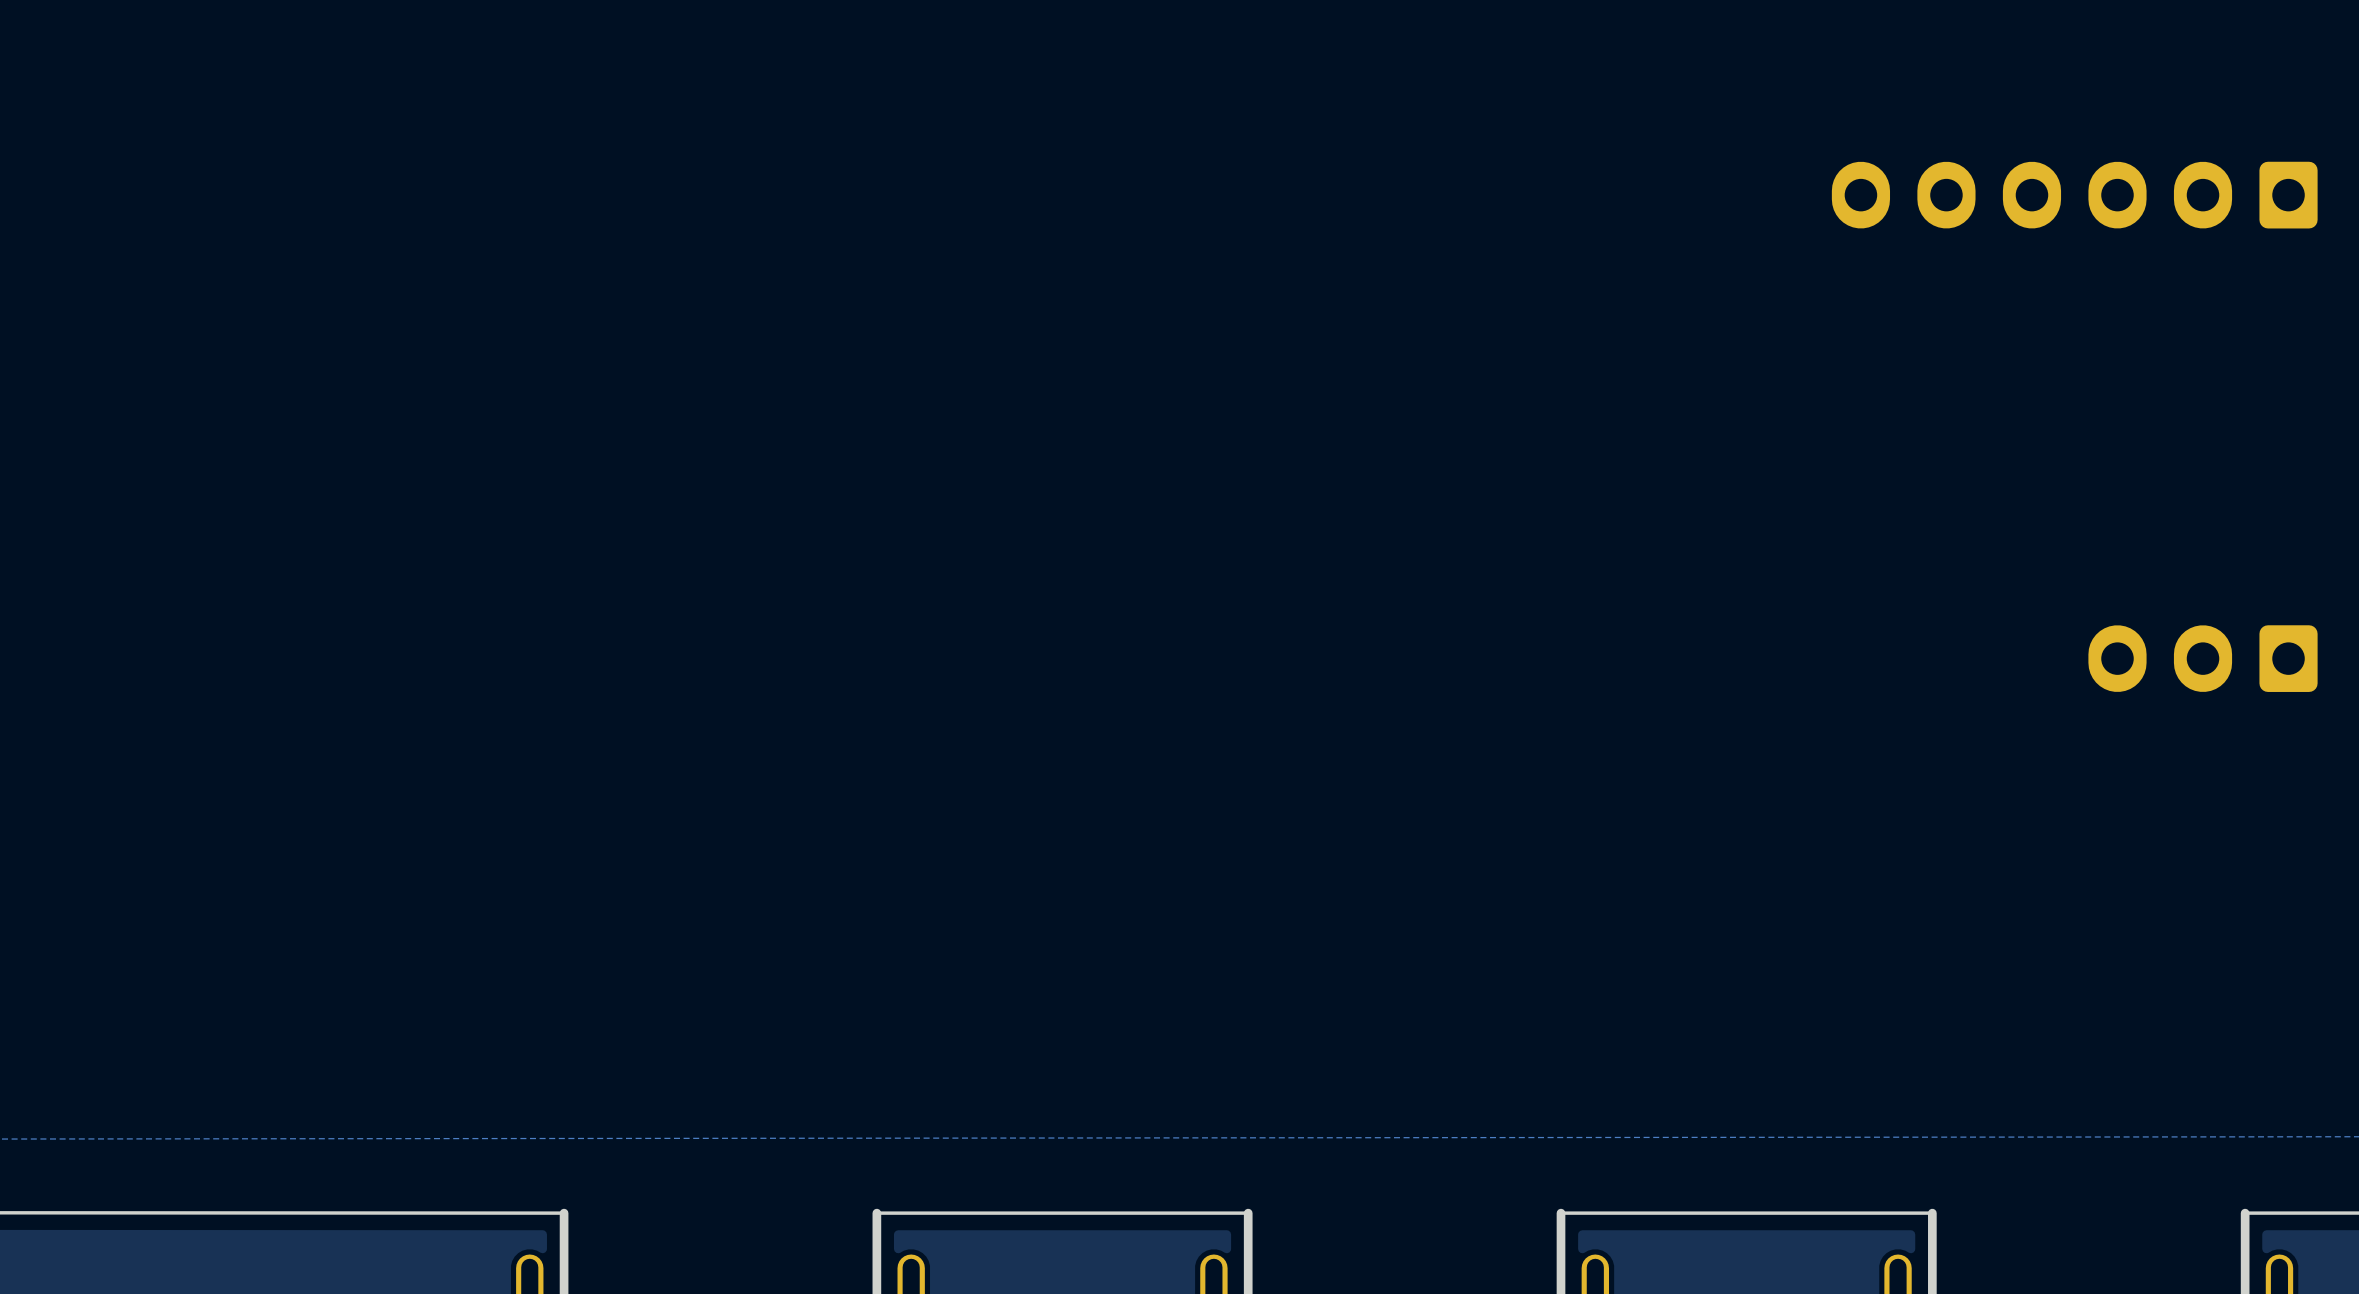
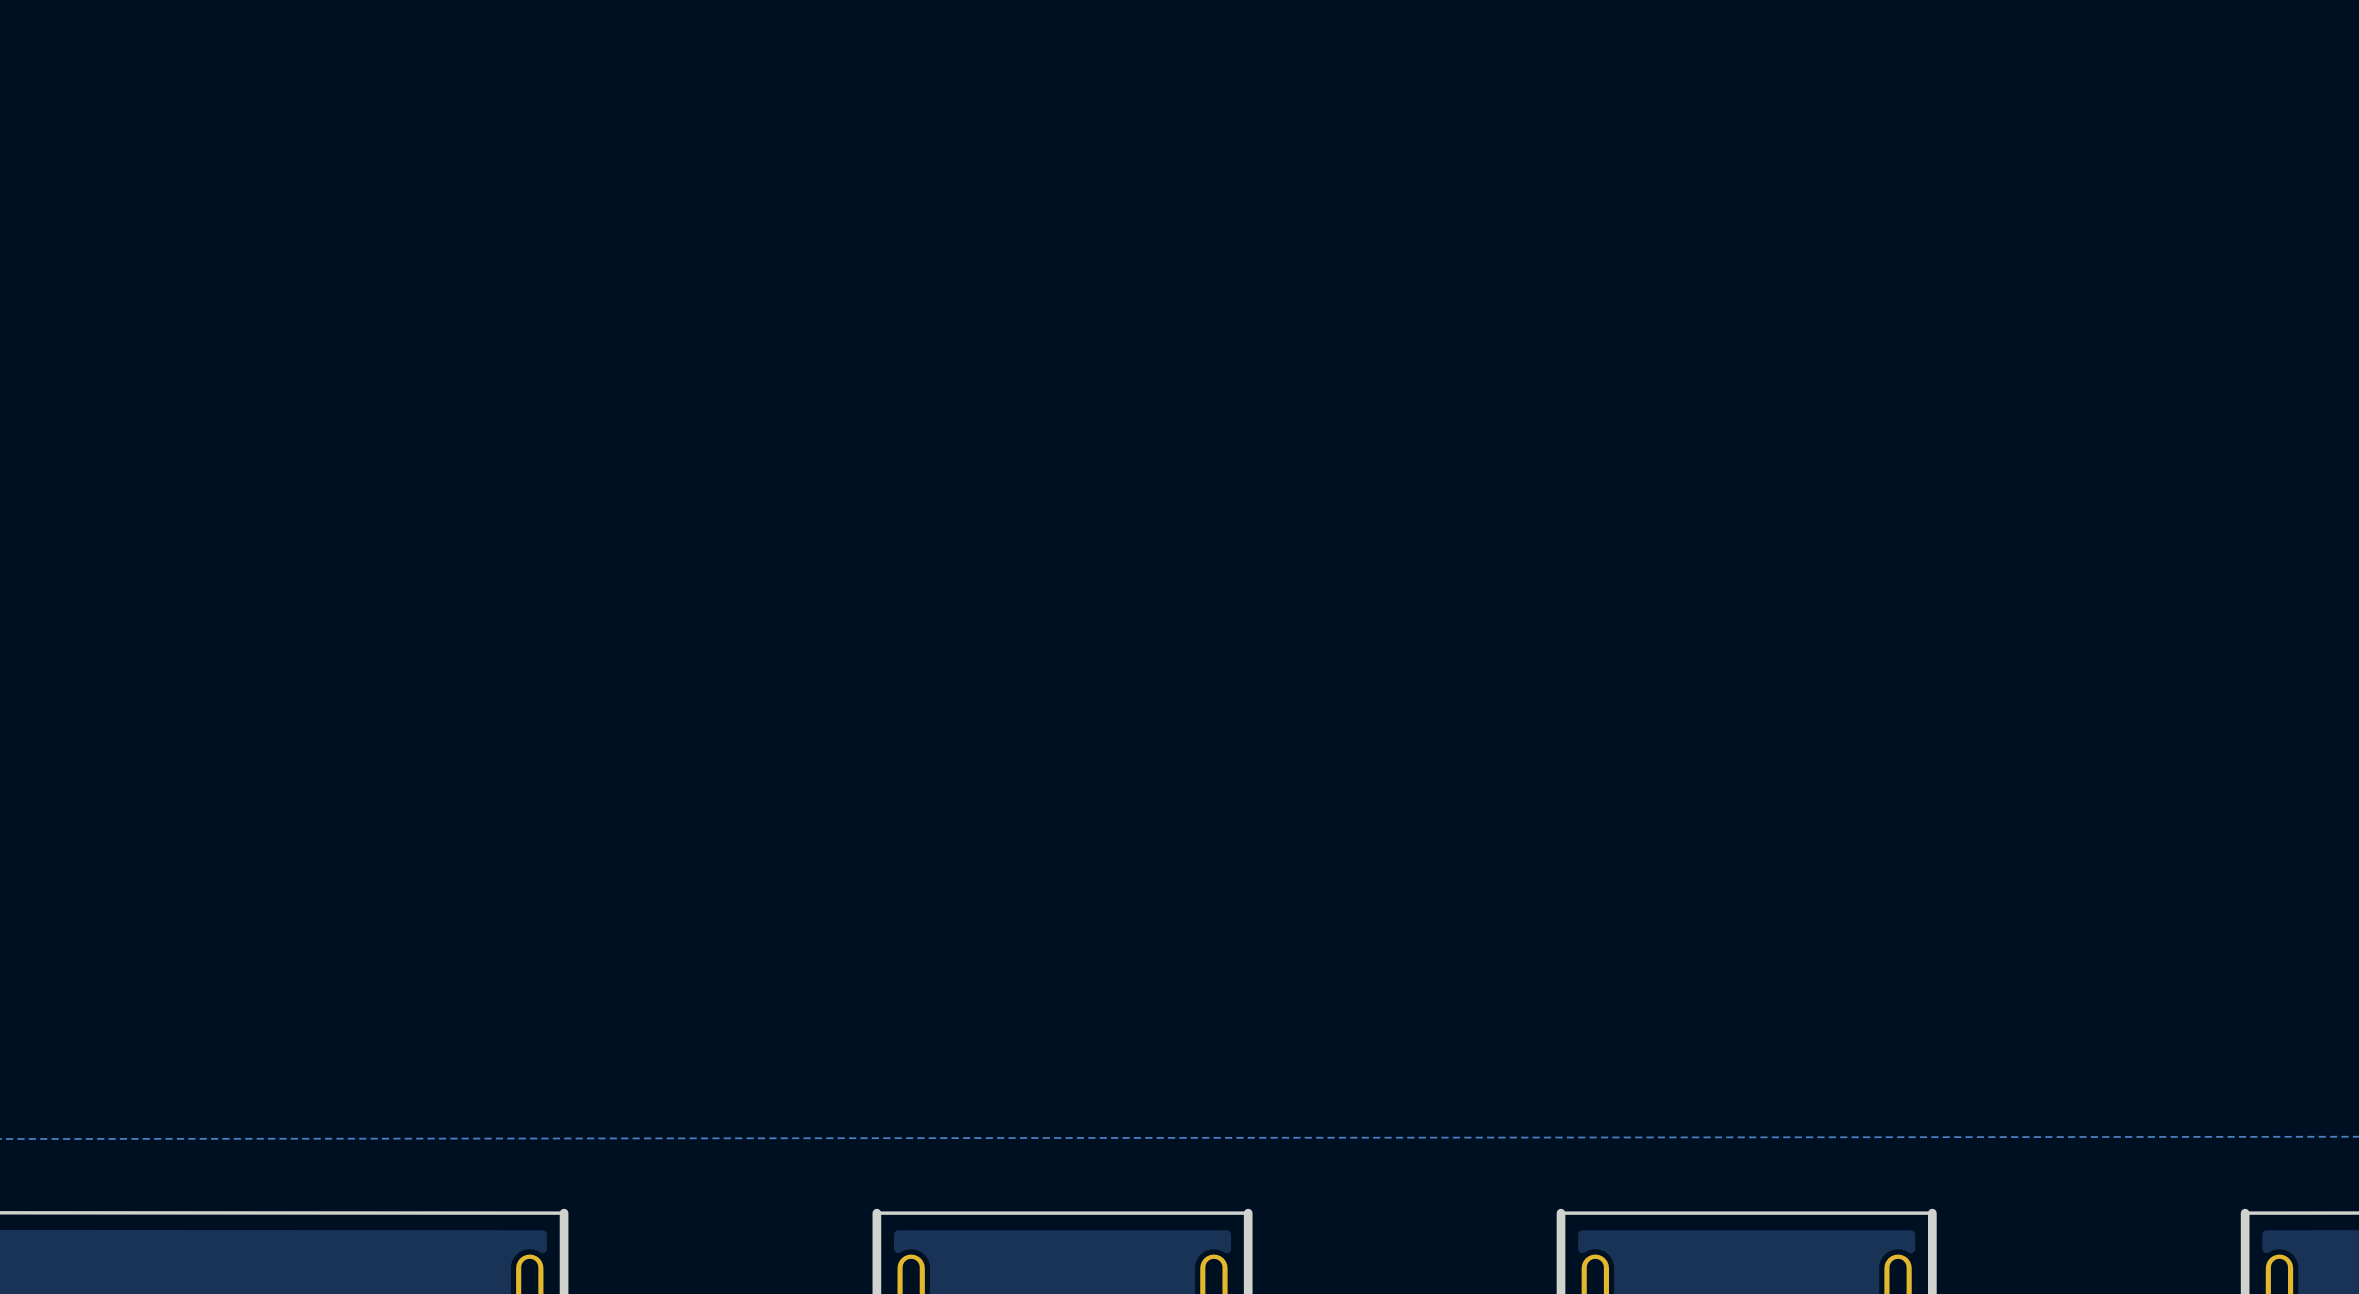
part: (2074, 195) -> none
part: (2203, 658) -> none

